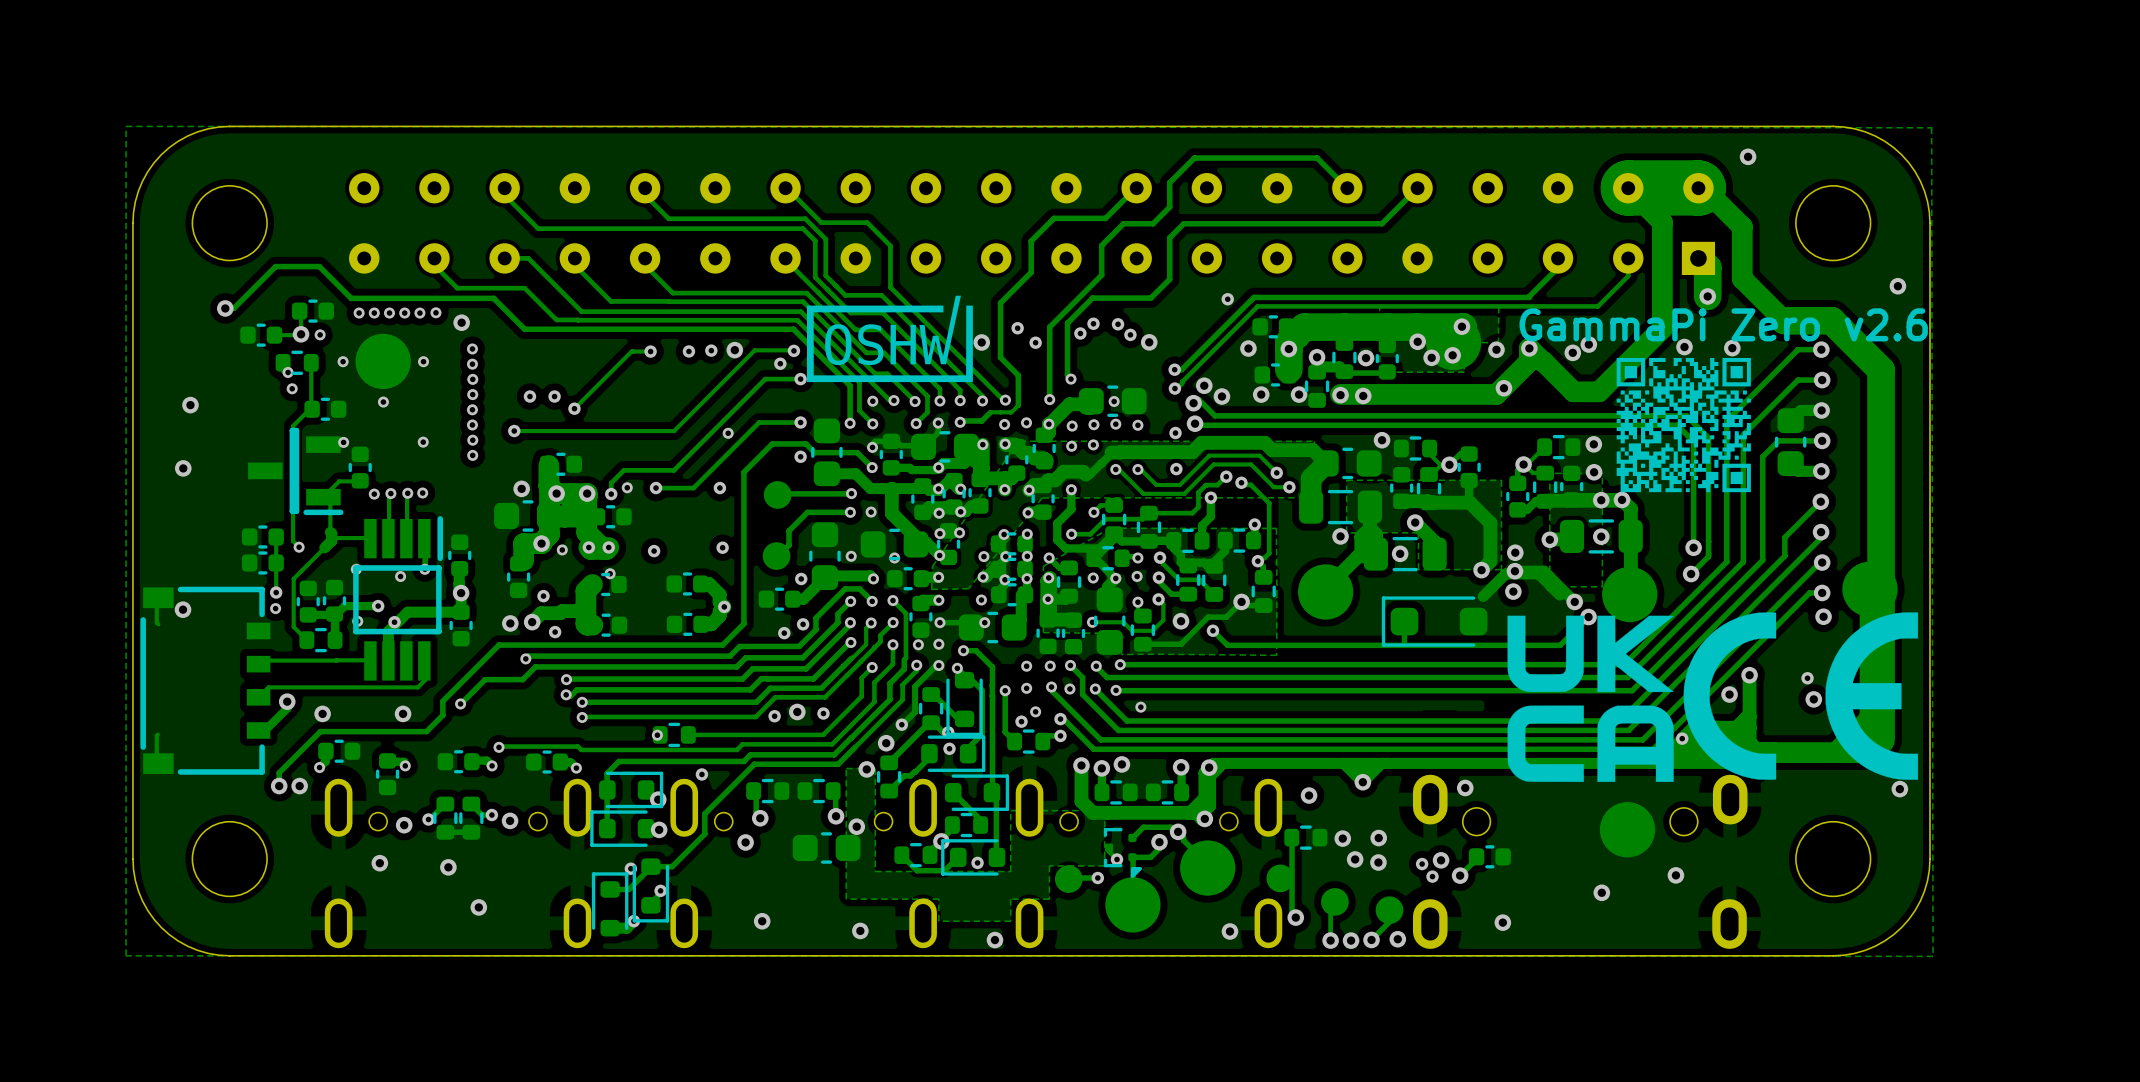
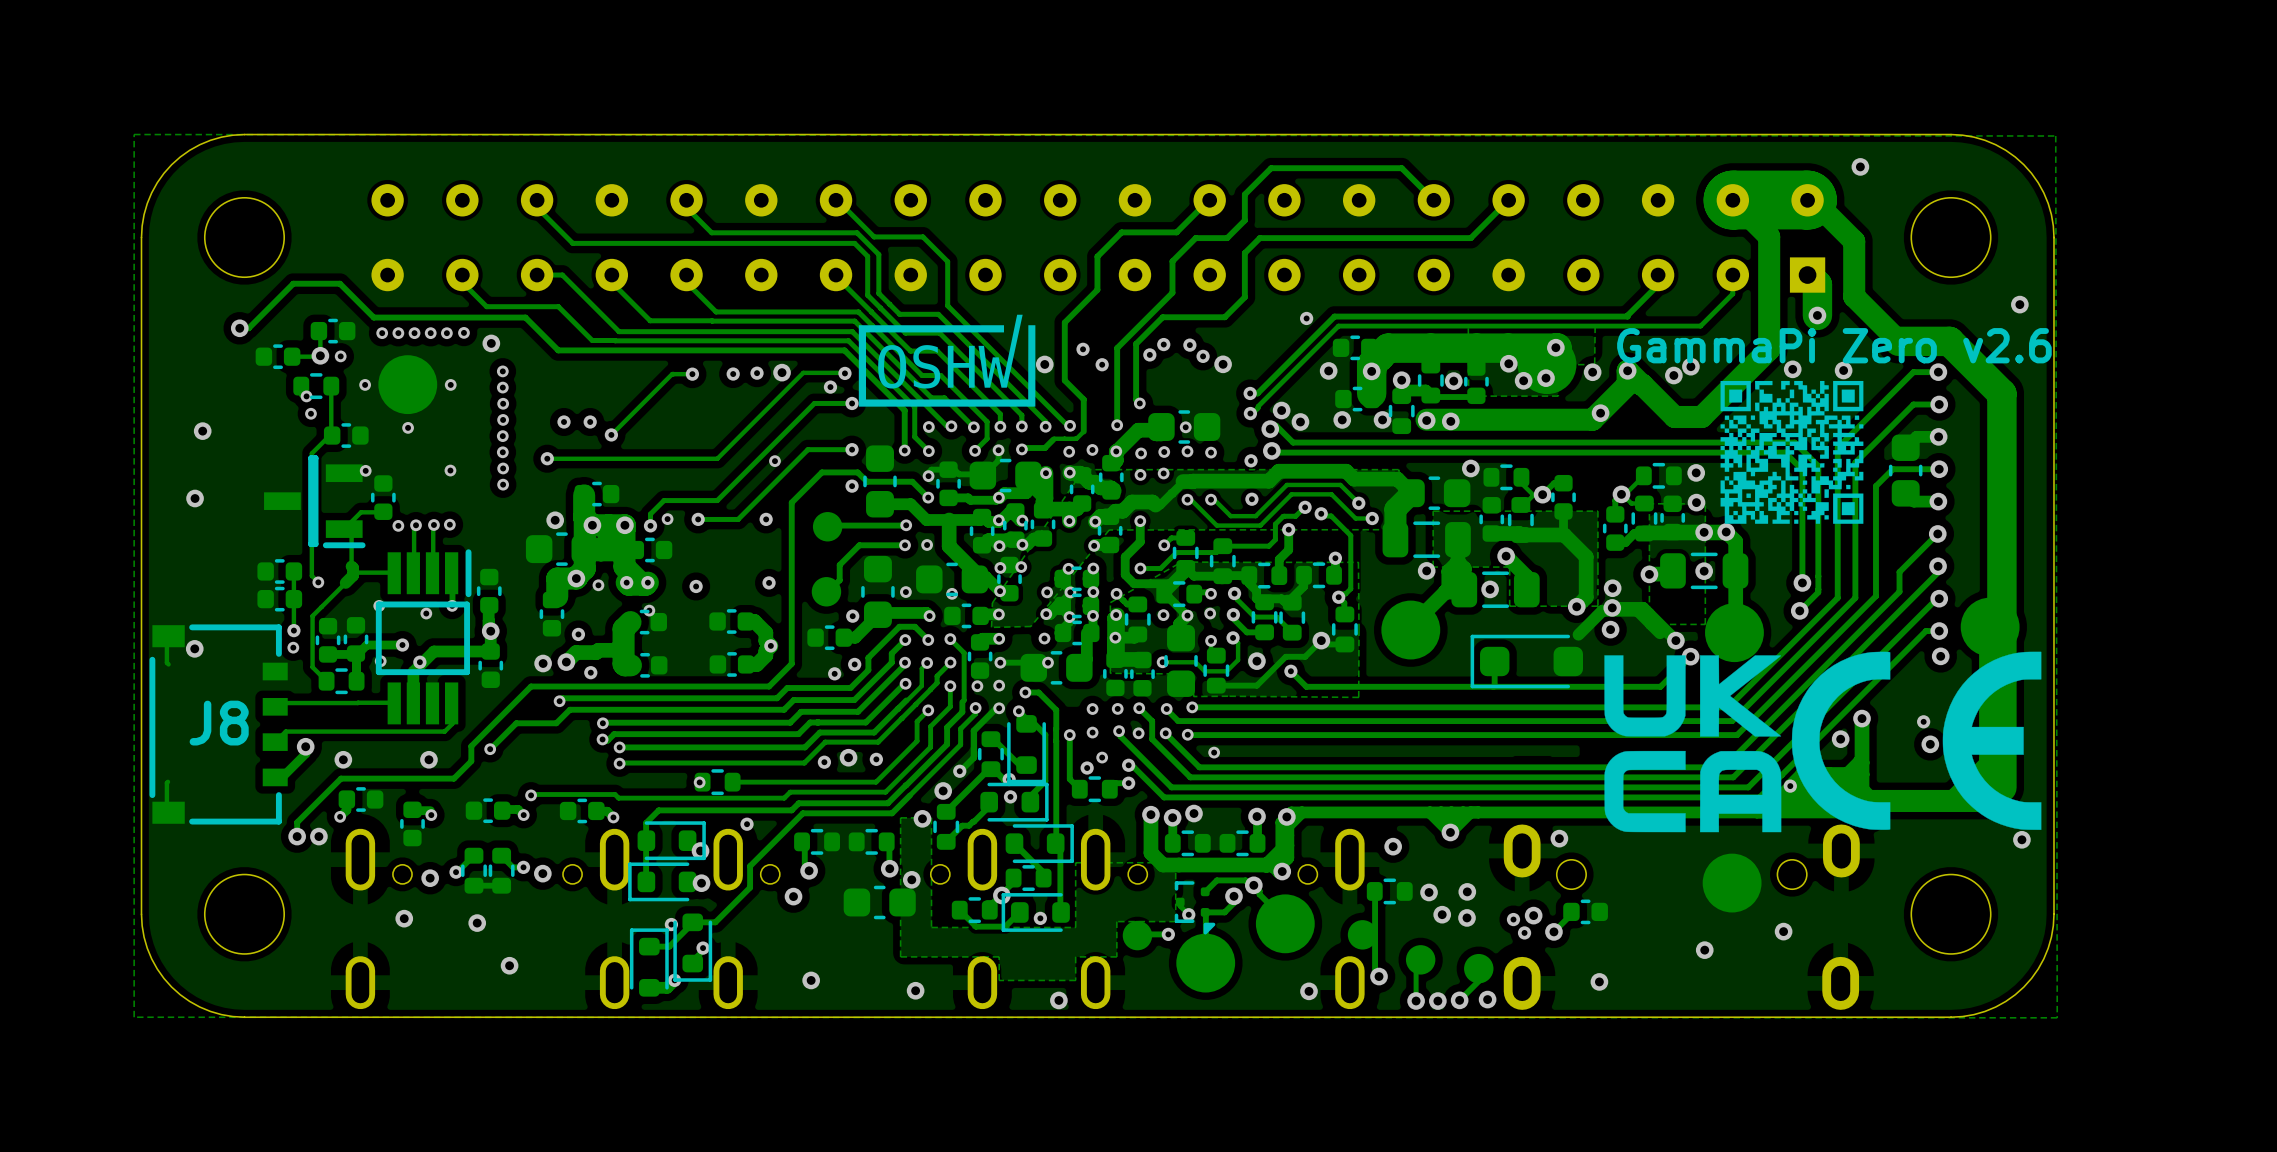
J8 name: none -> J8 (219, 723)

